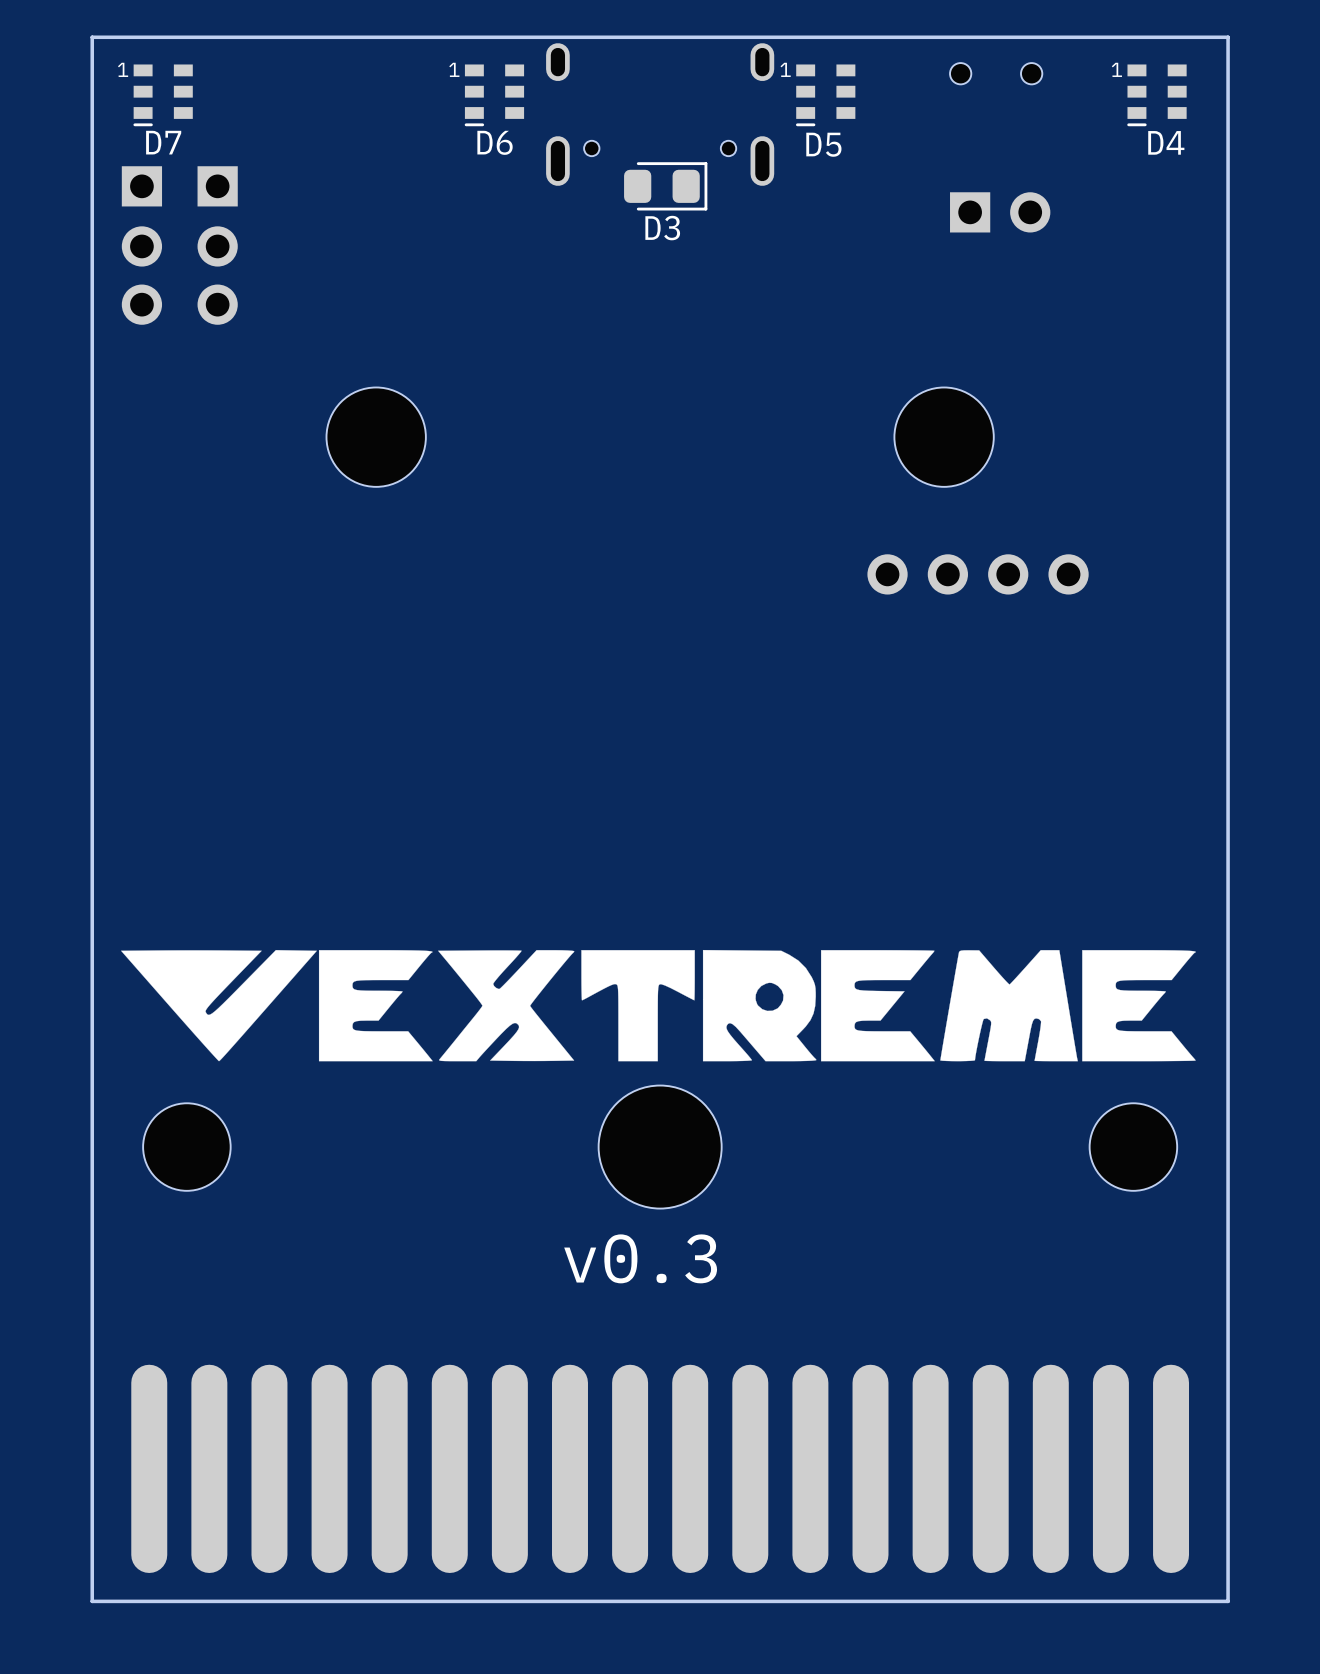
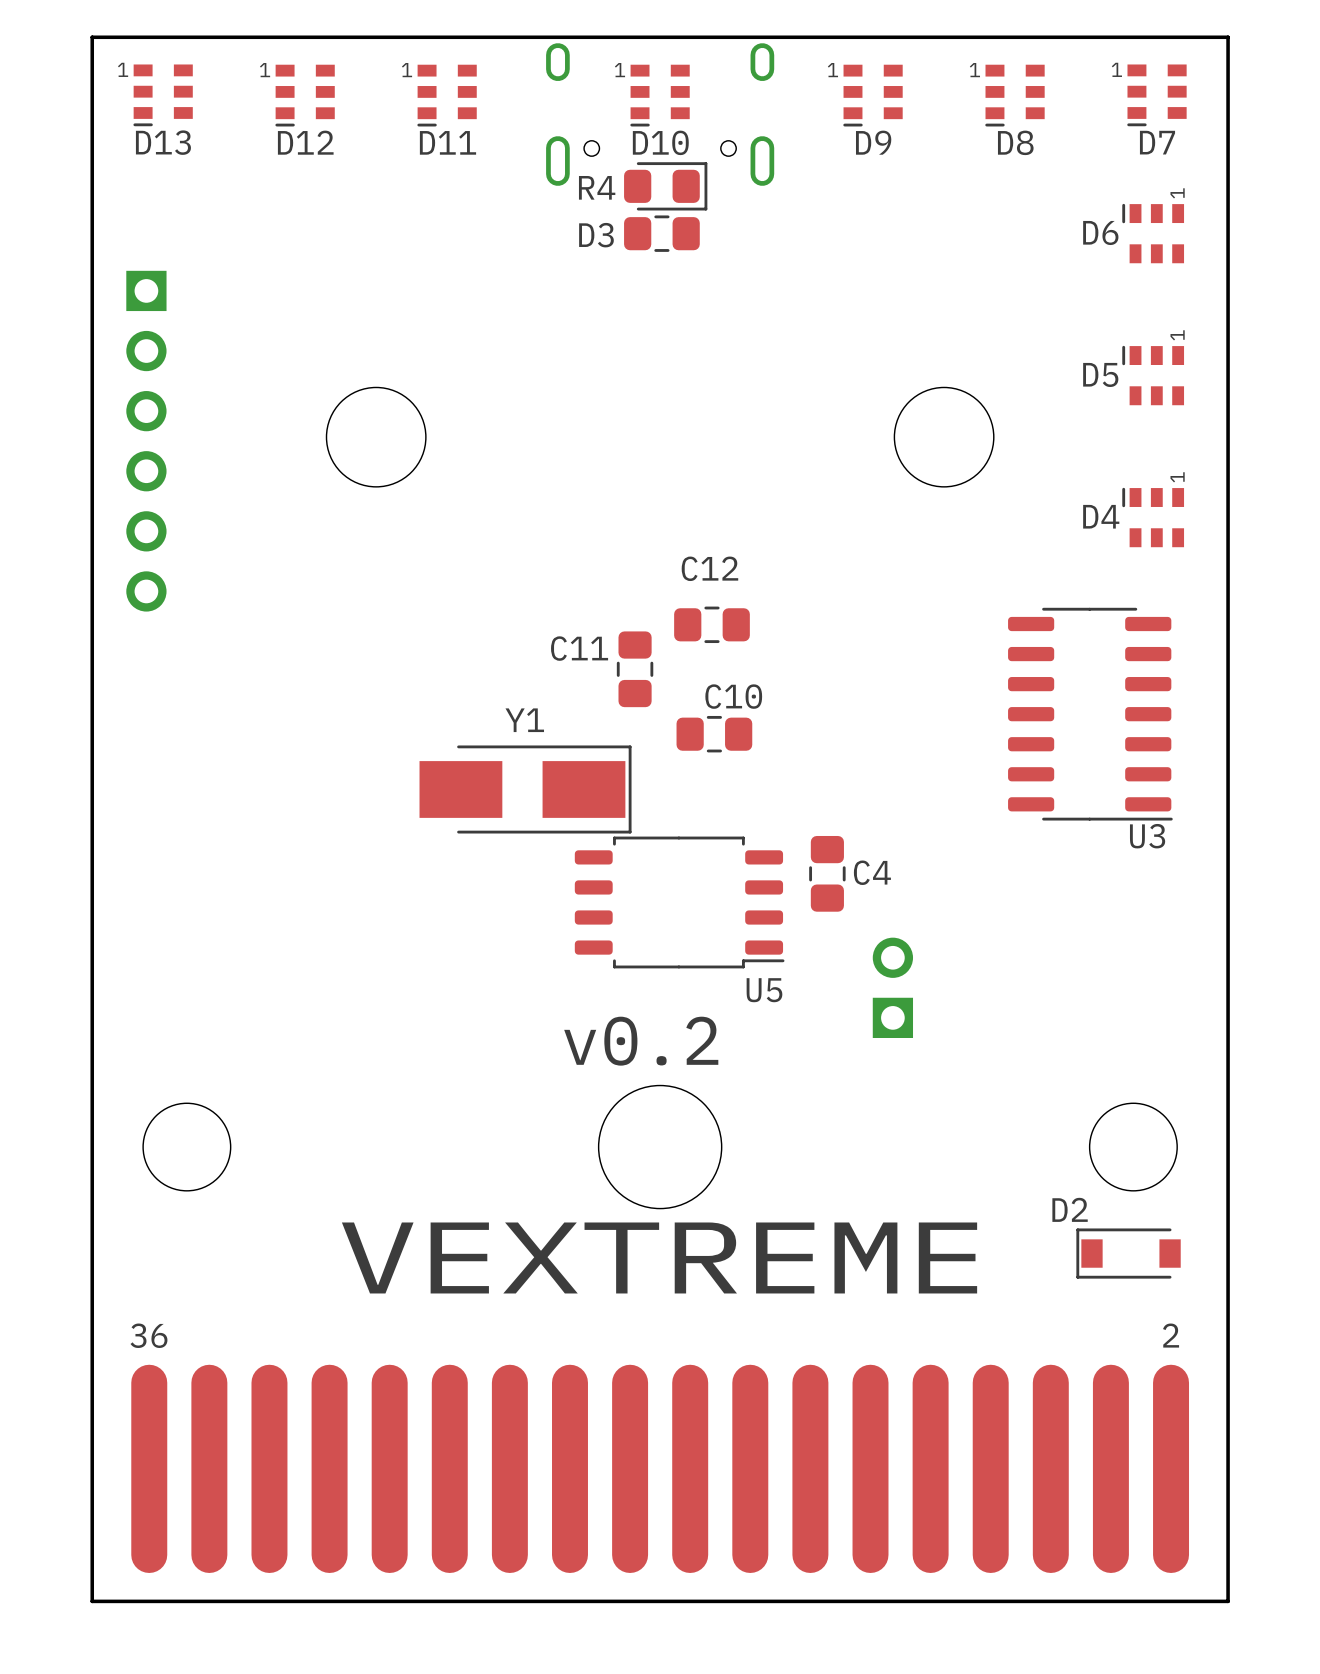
part: (996, 73) -> none
D12: none -> (305, 95)
D11: none -> (447, 95)
D6 rotation: 0° (494, 95) -> 90° clockwise (1153, 233)
D6 position: (494, 95) -> (1153, 233)
D10: none -> (660, 95)
D5 rotation: 0° (825, 95) -> 90° clockwise (1153, 375)
D5 position: (825, 95) -> (1153, 375)
D9: none -> (872, 95)
D8: none -> (1014, 95)
D7 name: D7 (163, 142) -> D13 (163, 142)
D4 name: D4 (1166, 142) -> D7 (1157, 142)
part: (1000, 212) -> none
D3 name position: D3 (662, 228) -> D3 (596, 235)
R4: none -> (661, 233)
part: (141, 245) -> none
part: (217, 245) -> none
part: none -> (146, 441)
D4: none -> (1153, 517)
part: (887, 574) -> none
part: (947, 574) -> none
part: (1008, 574) -> none
part: (1068, 574) -> none
C12: none -> (711, 624)
C11: none -> (635, 669)
U3: none -> (1090, 714)
C10: none -> (714, 734)
Y1: none -> (525, 789)
C4: none -> (827, 873)
U5: none -> (679, 902)
drawing: [121, 949, 1196, 1062] -> none
part: none -> (892, 987)
text: none -> v0.2 (641, 1041)
D2: none -> (1128, 1253)
text: v0.3 (640, 1258) -> VEXTREME (659, 1257)
part text: none -> 36 (148, 1335)
part text: none -> 2 (1171, 1335)

